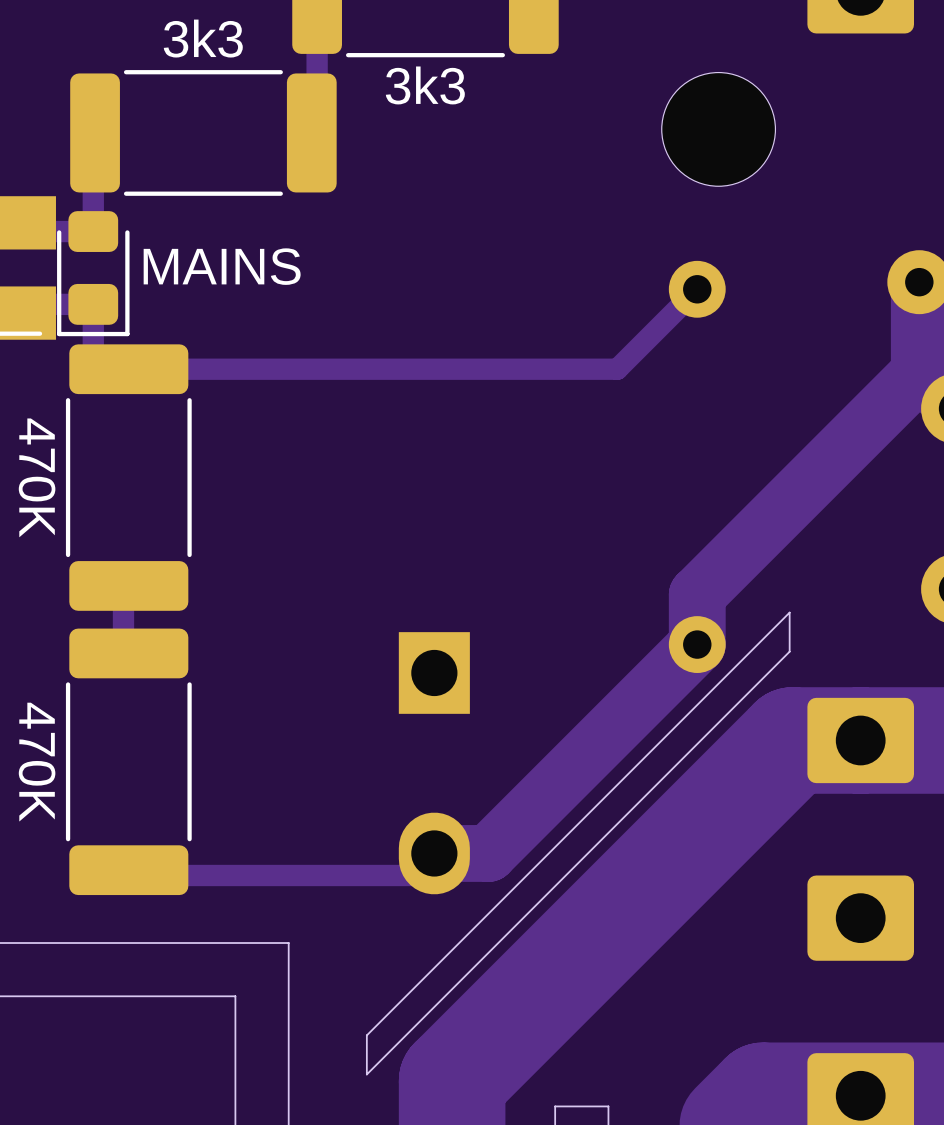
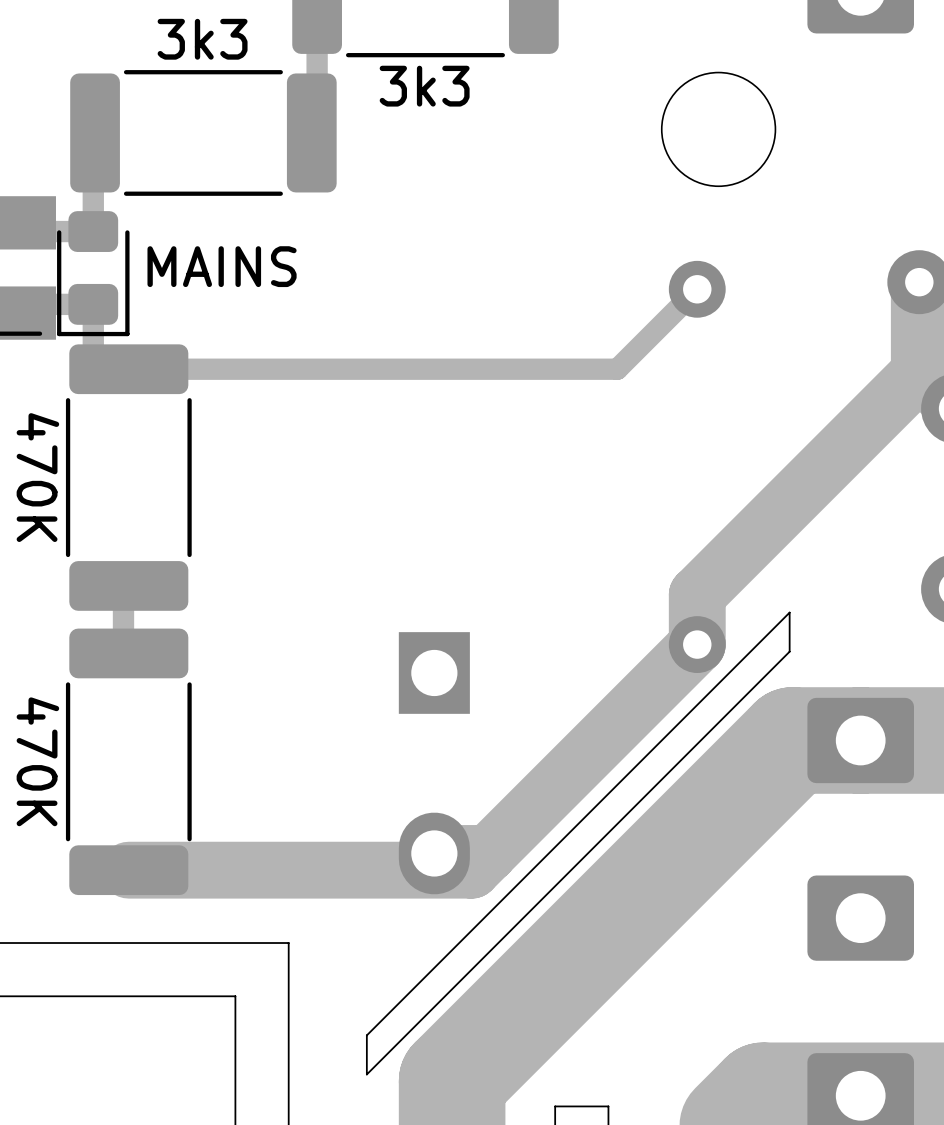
track: (434, 853) (412, 875) (134, 875) -> none
track: none -> (488, 853) (471, 870) (128, 870)

